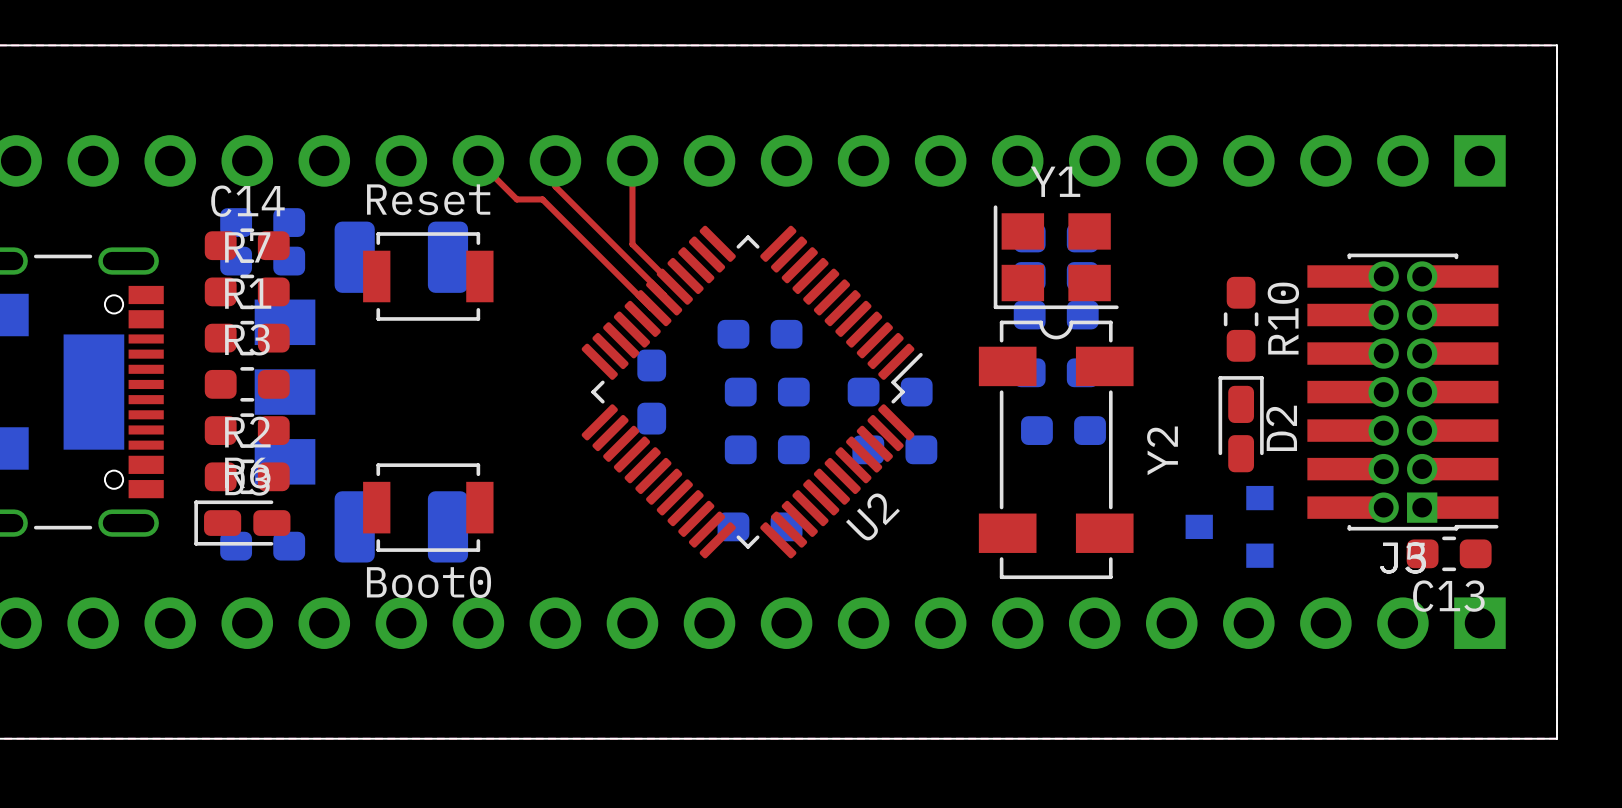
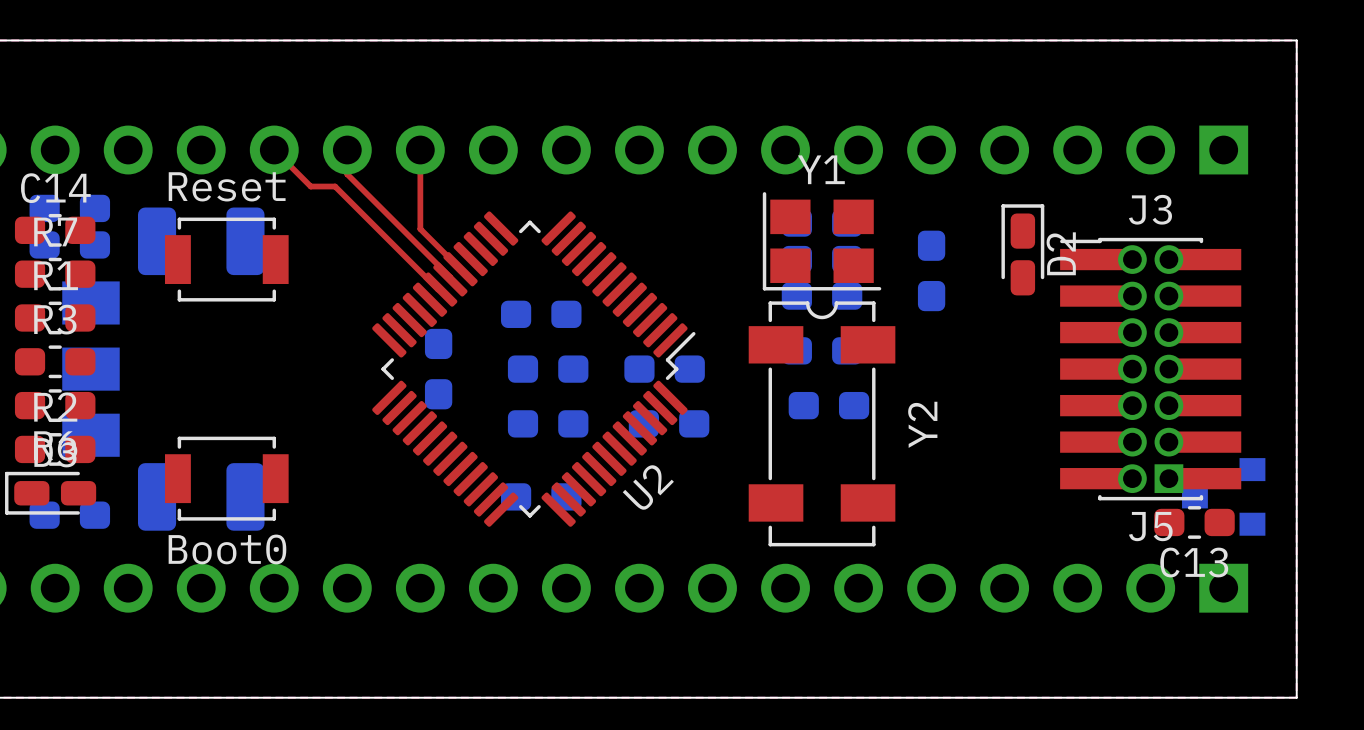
R10 side: top (1241, 319) -> bottom (931, 270)
J3 rotation: 0° (1402, 392) -> 180° (1150, 369)
D2 position: (1241, 424) -> (1022, 249)
part position: (1229, 526) -> (1223, 496)

